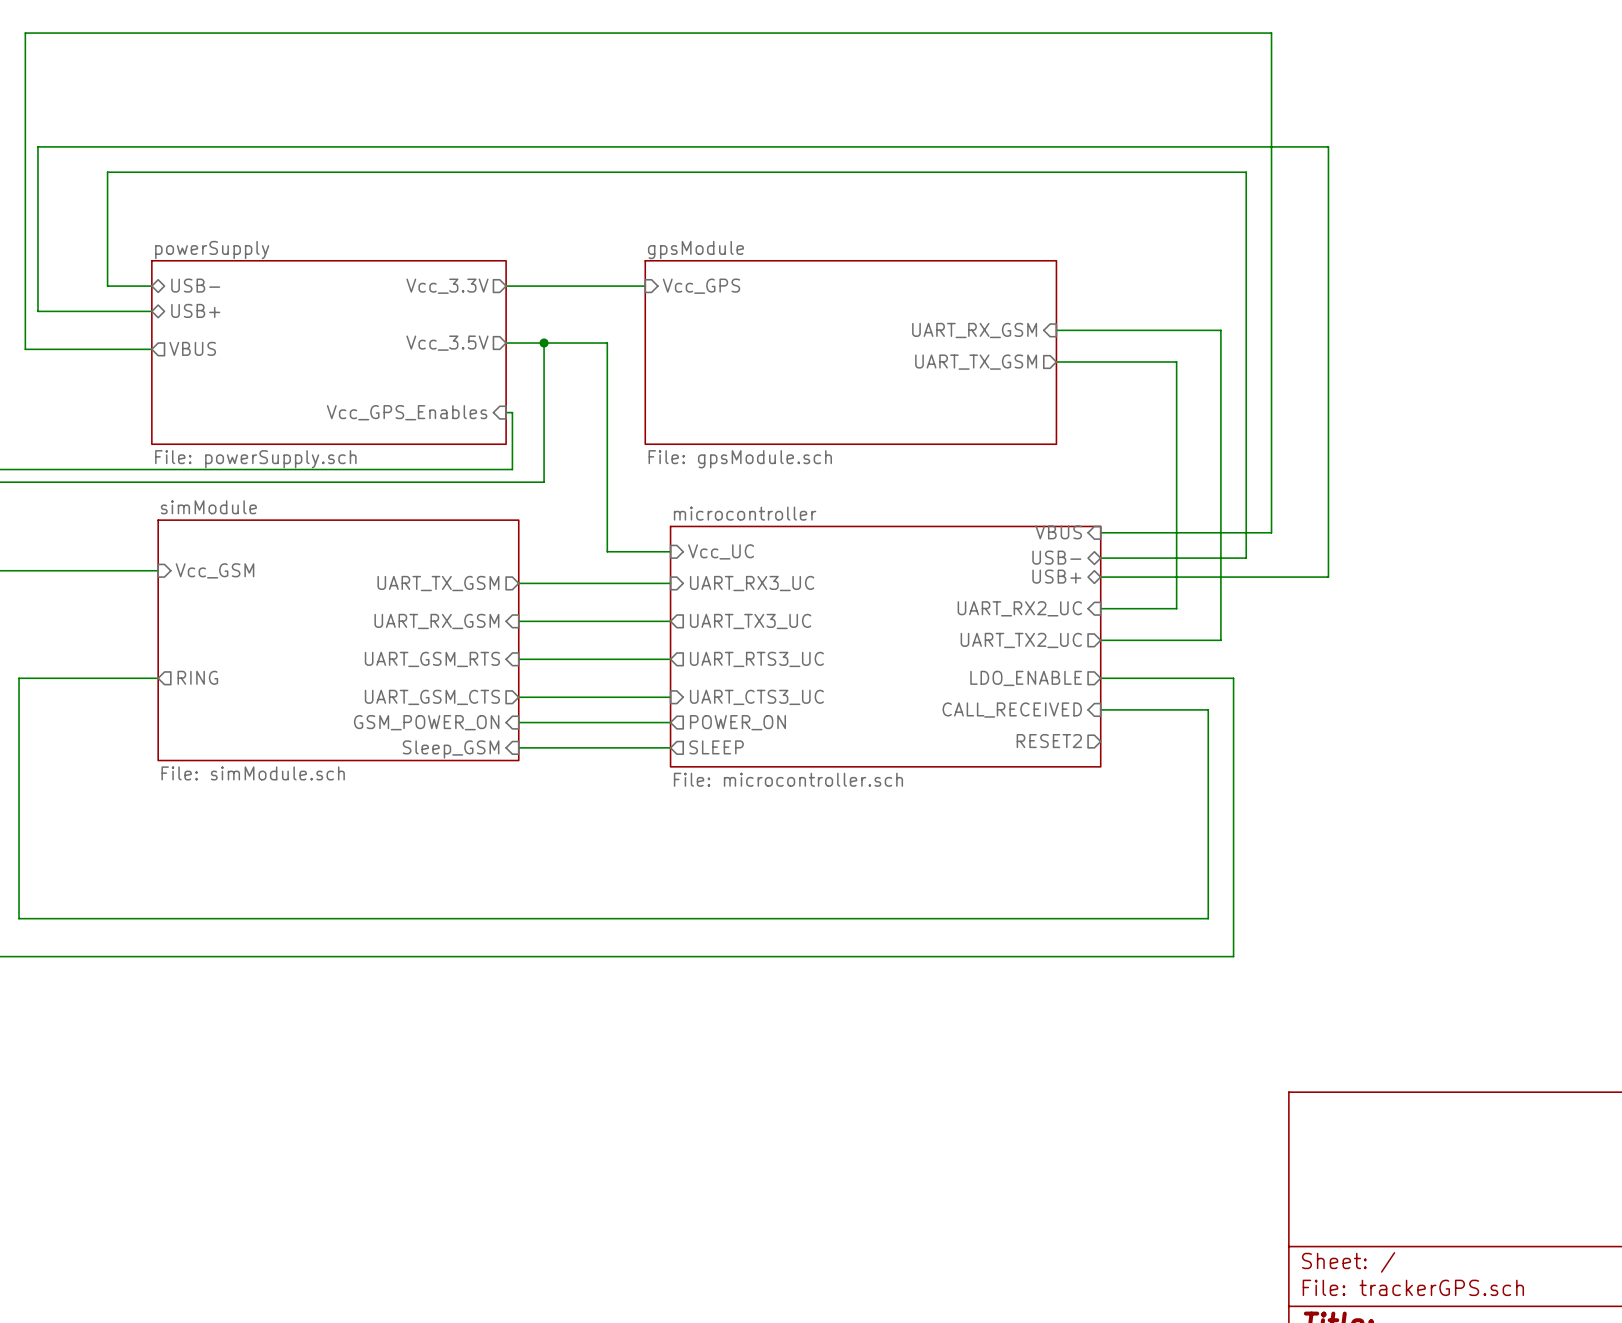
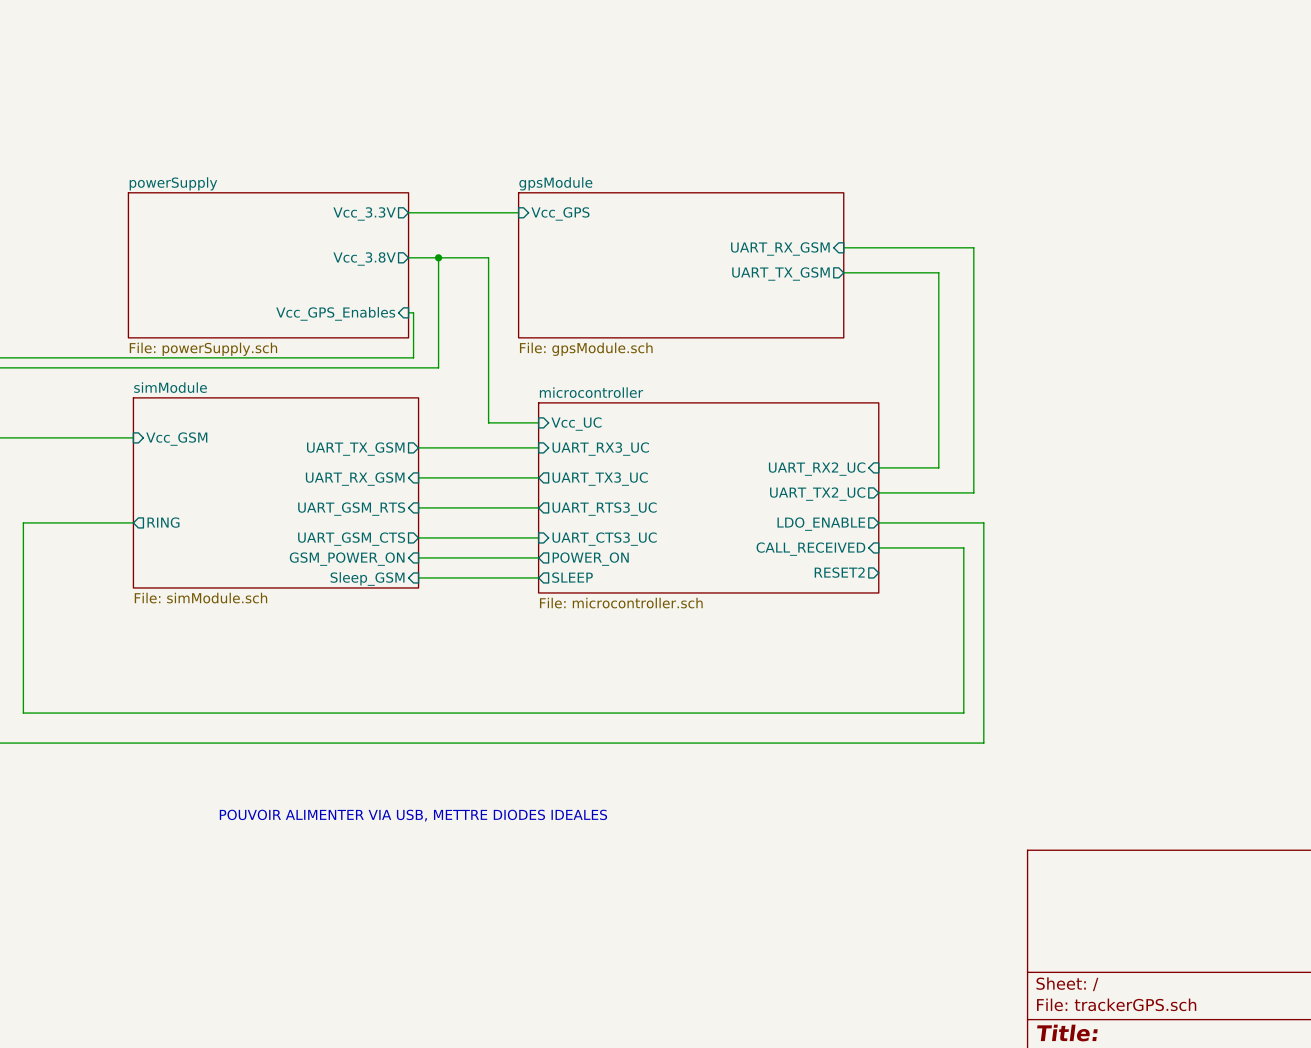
sheet pin: USB- (195, 285) -> none
wire: (151, 286) (107, 286) (107, 172) (1246, 172) (1246, 558) (1100, 558) -> none
sheet pin: USB+ (195, 310) -> none
wire: (151, 311) (37, 311) (37, 146) (1328, 146) (1328, 577) (1100, 577) -> none
sheet pin: Vcc_3.5V (447, 343) -> Vcc_3.8V (364, 258)
sheet pin: VBUS (192, 348) -> none
wire: (151, 349) (25, 349) (25, 33) (1271, 33) (1271, 532) (1100, 532) -> none
sheet pin: VBUS (1058, 532) -> none
sheet pin: USB- (1056, 557) -> none
sheet pin: USB+ (1056, 576) -> none
text: none -> POUVOIR ALIMENTER VIA USB, METTRE DIODES IDEALES (413, 815)

